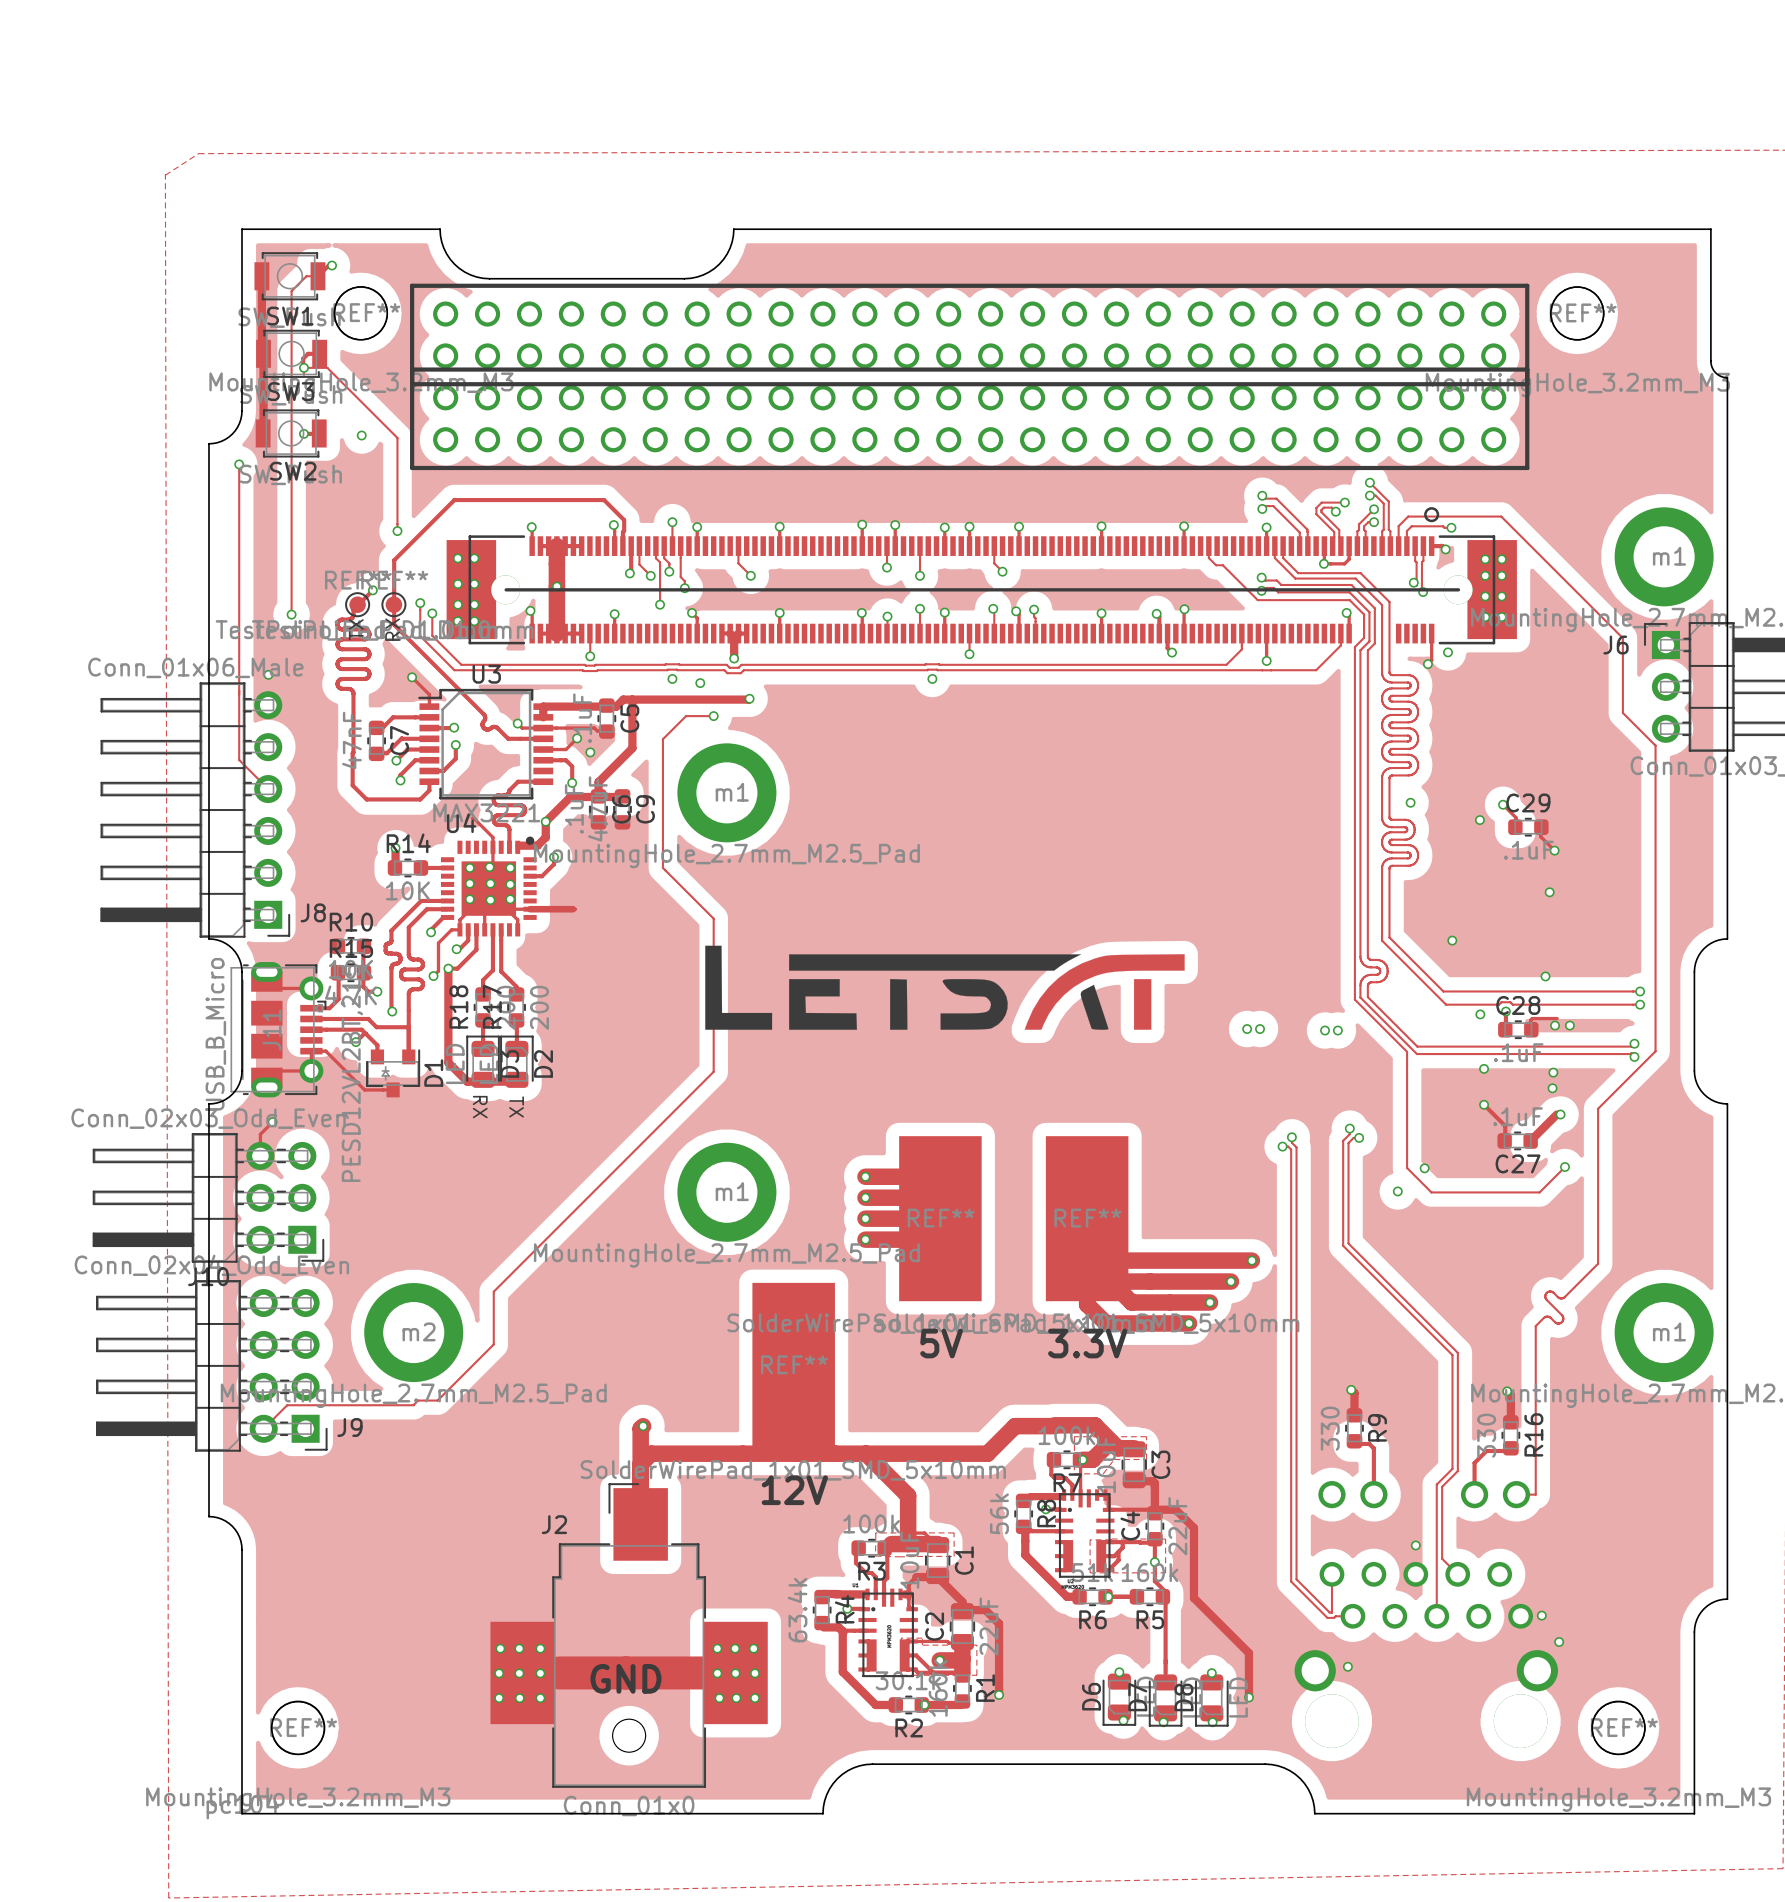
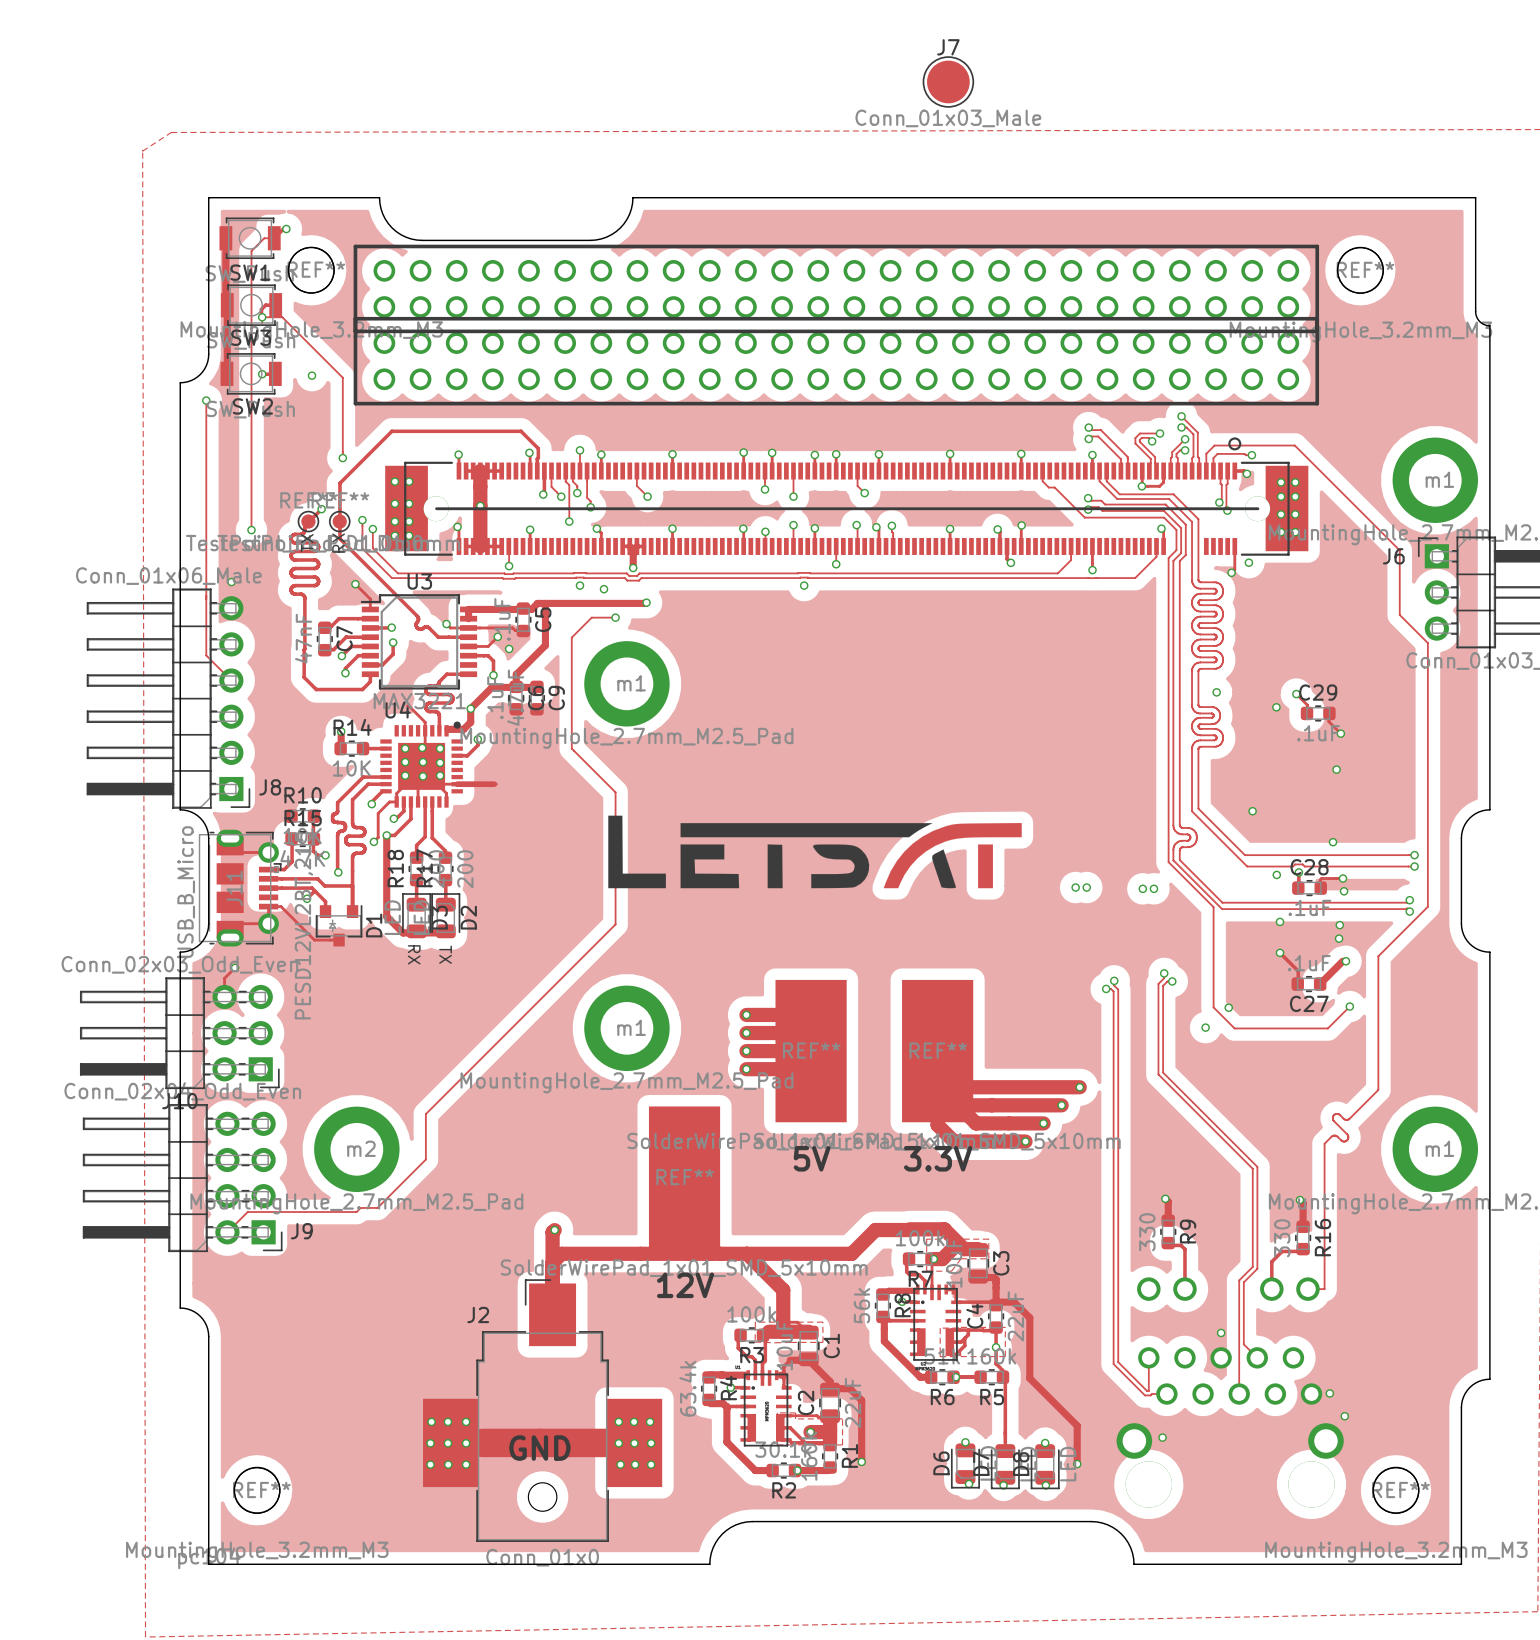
J7: none -> Conn_01x03_Male (948, 81)
via: none -> (1342, 878)
via: (1555, 1025) -> none
via: (1569, 1025) -> none
via: none -> (1344, 891)

